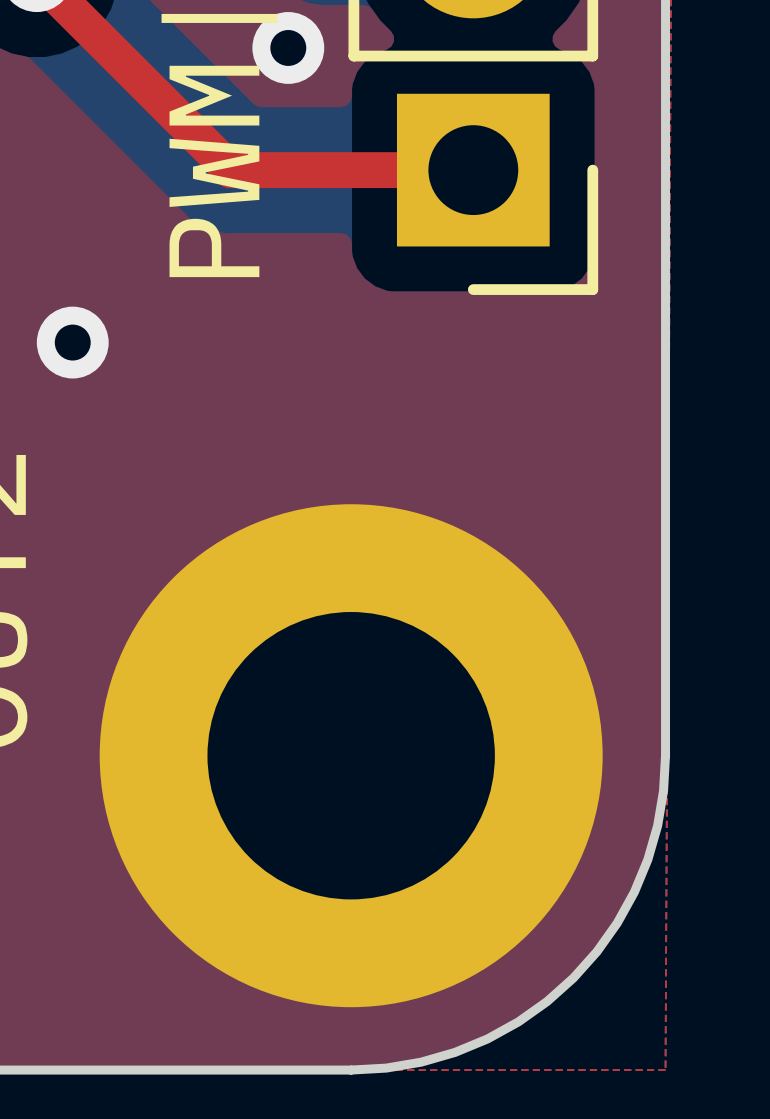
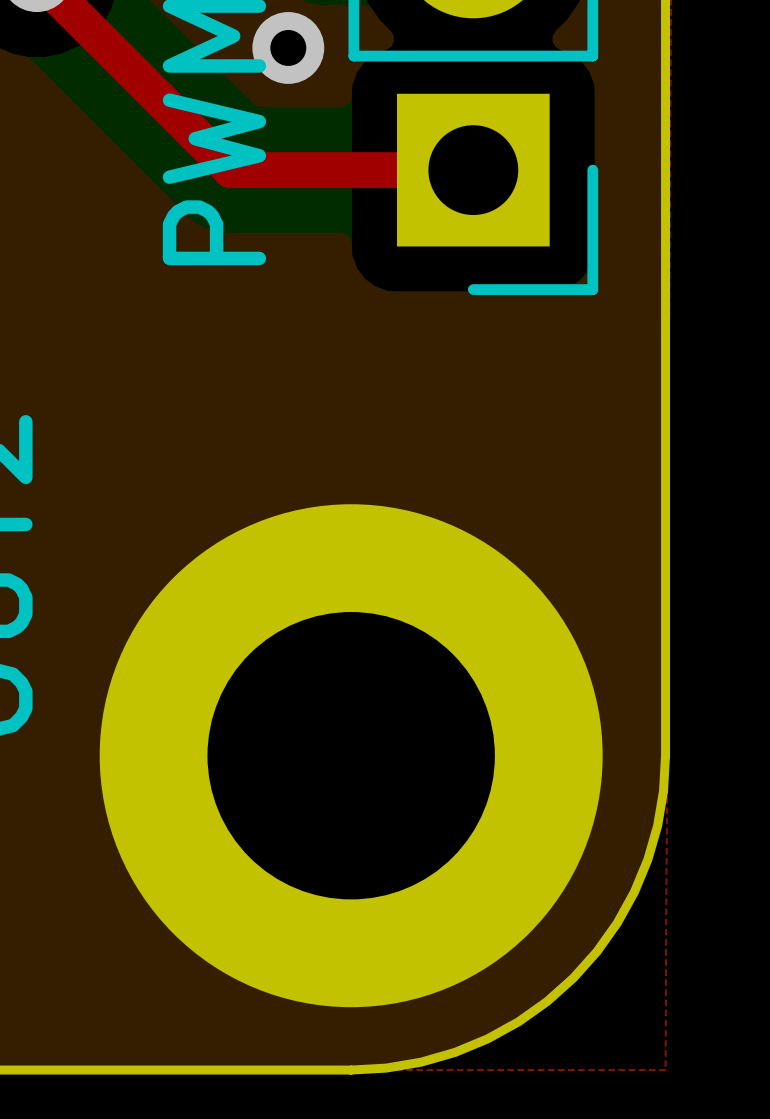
via: (72, 342) -> none

